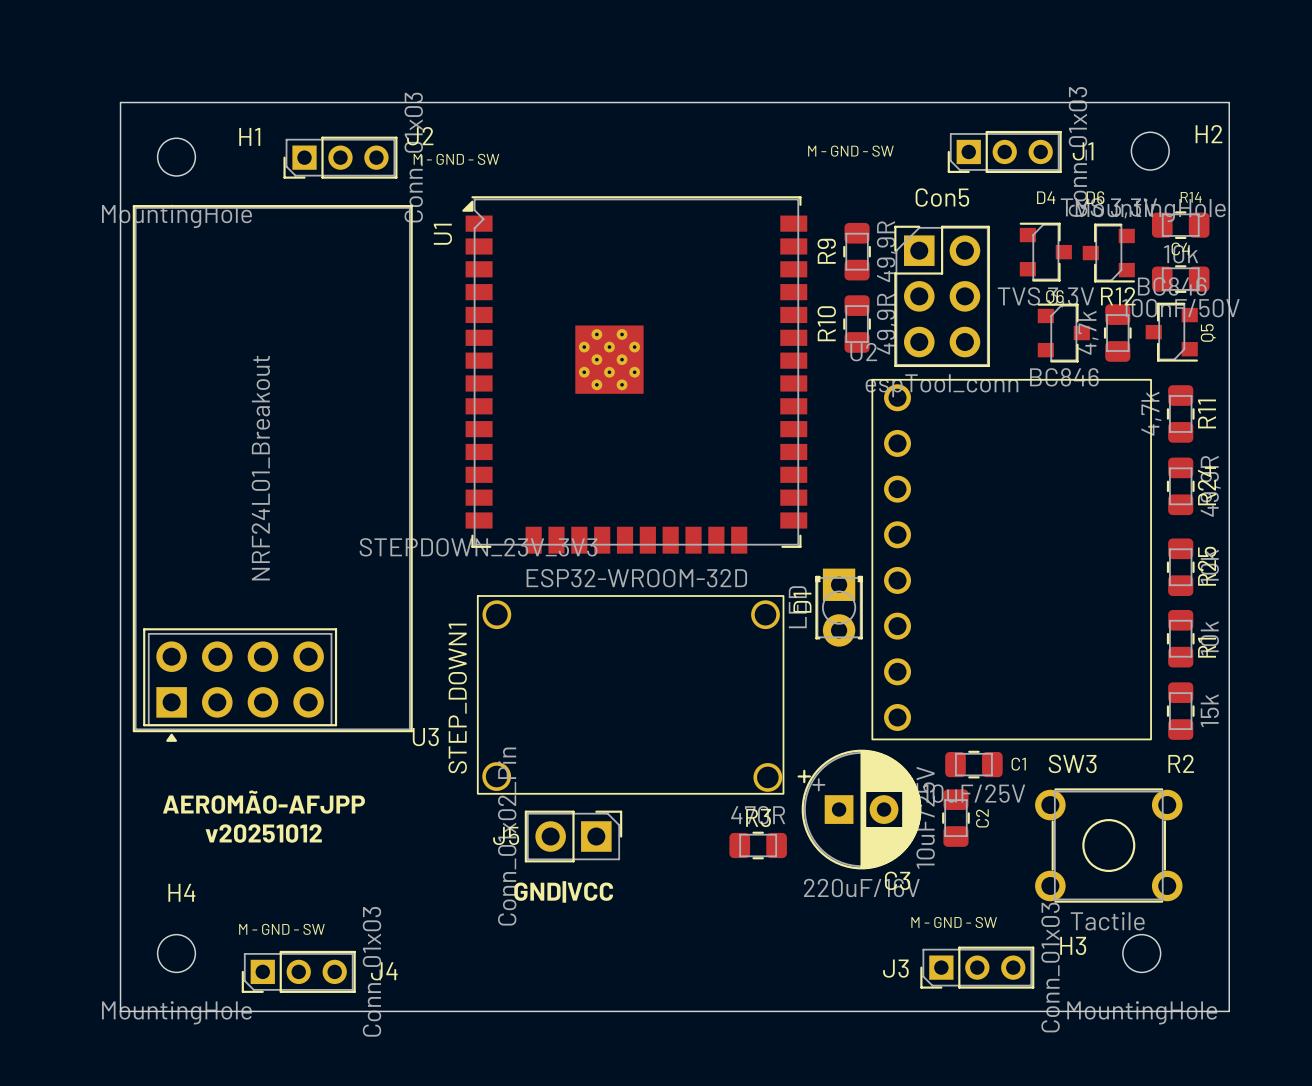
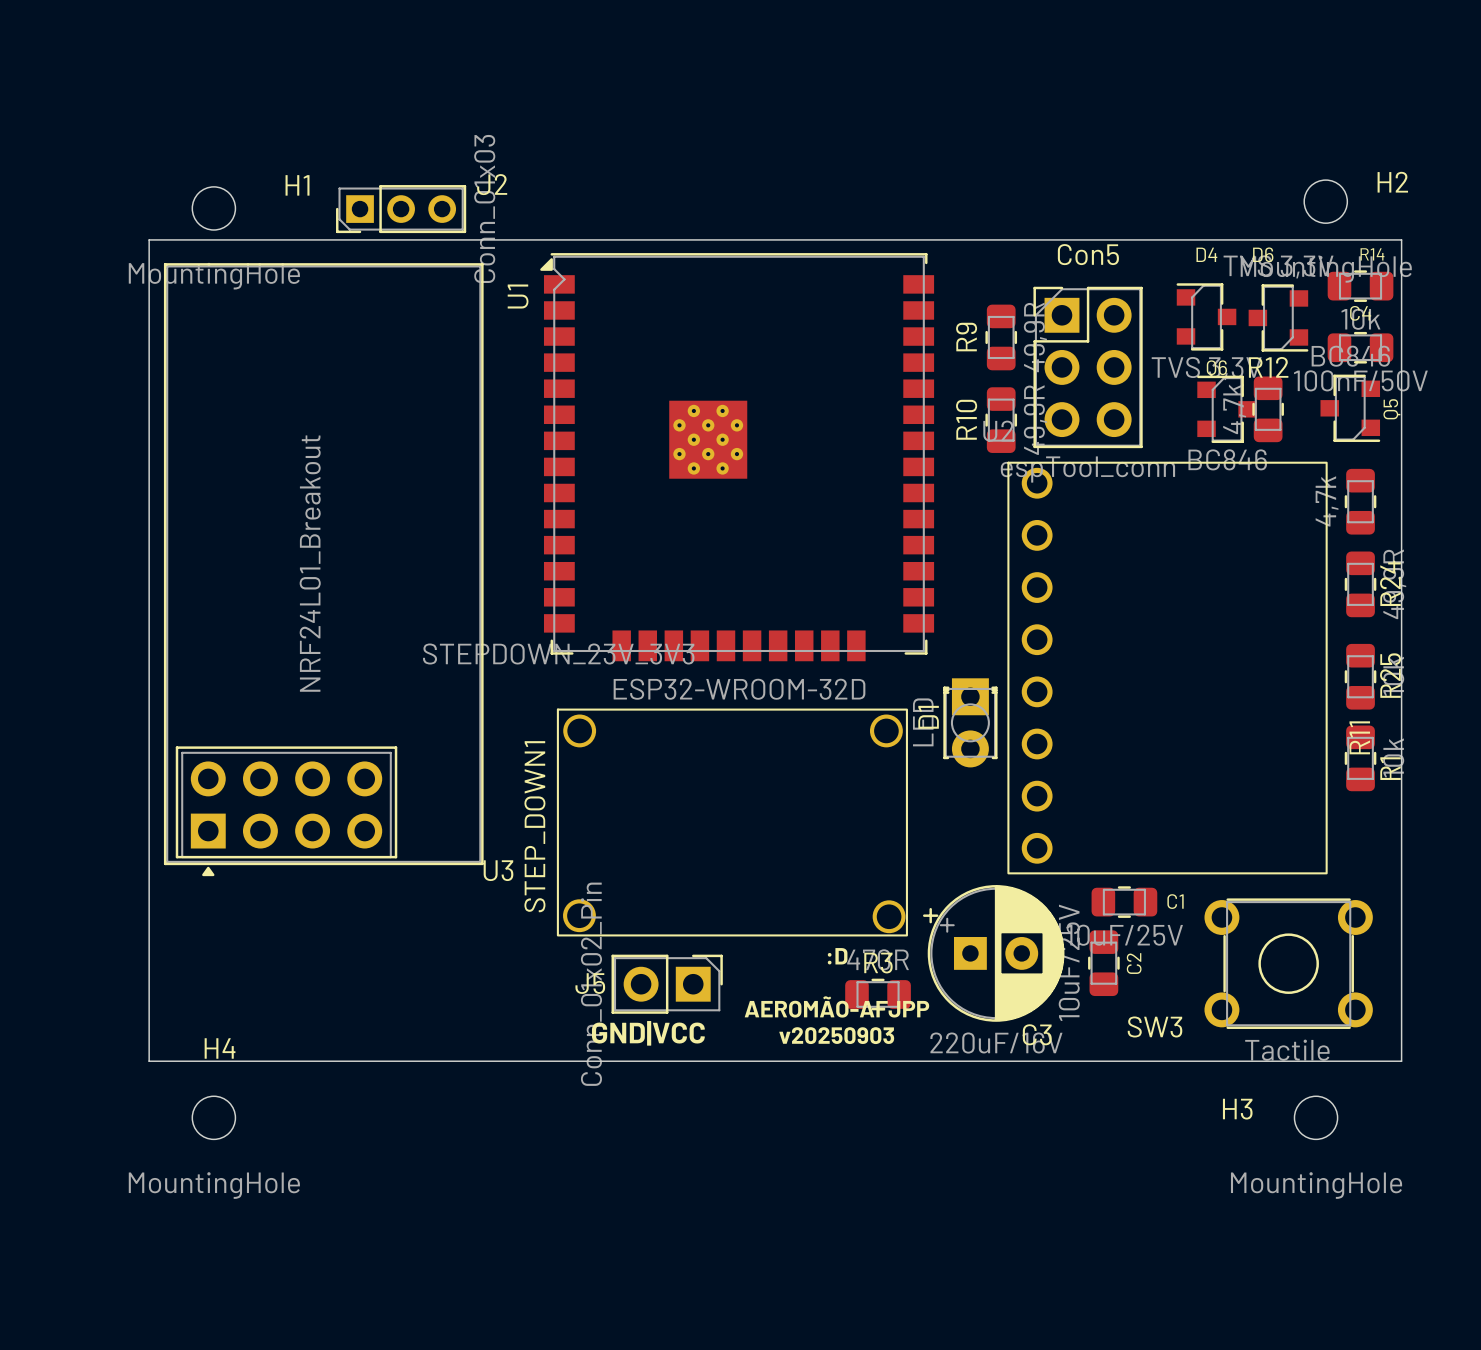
board edge: (120, 102) (1229, 102) (1229, 1011) (120, 1011) (120, 102) -> (149, 239) (149, 1061) (1401, 1061) (1401, 239) (149, 239)
text: M - GND - SW (850, 151) -> none
J1: Conn_01x03 (1004, 151) -> none
text: M - GND - SW (456, 159) -> none
R9 position: (857, 251) -> (1001, 337)
R10 position: (857, 324) -> (1001, 420)
R12 position: (1117, 333) -> (1268, 409)
R11 name position: R11 (1207, 413) -> R11 (1359, 737)
R2: 15k (1180, 711) -> none
SW3 name position: SW3 (1072, 763) -> SW3 (1155, 1026)
text: AEROMÃO-AFJPP (263, 802) -> none
text: none -> :D (837, 956)
text: v20251012 (263, 833) -> none
SW3 position: (1108, 845) -> (1288, 963)
text: none -> AEROMÃO-AFJPP (836, 1006)
text: none -> v20250903 (836, 1035)
text position: GND|VCC (563, 891) -> GND|VCC (648, 1033)
text: M - GND - SW (954, 922) -> none
text: M - GND - SW (281, 929) -> none
J3: Conn_01x03 (977, 967) -> none
J4: Conn_01x03 (298, 971) -> none

